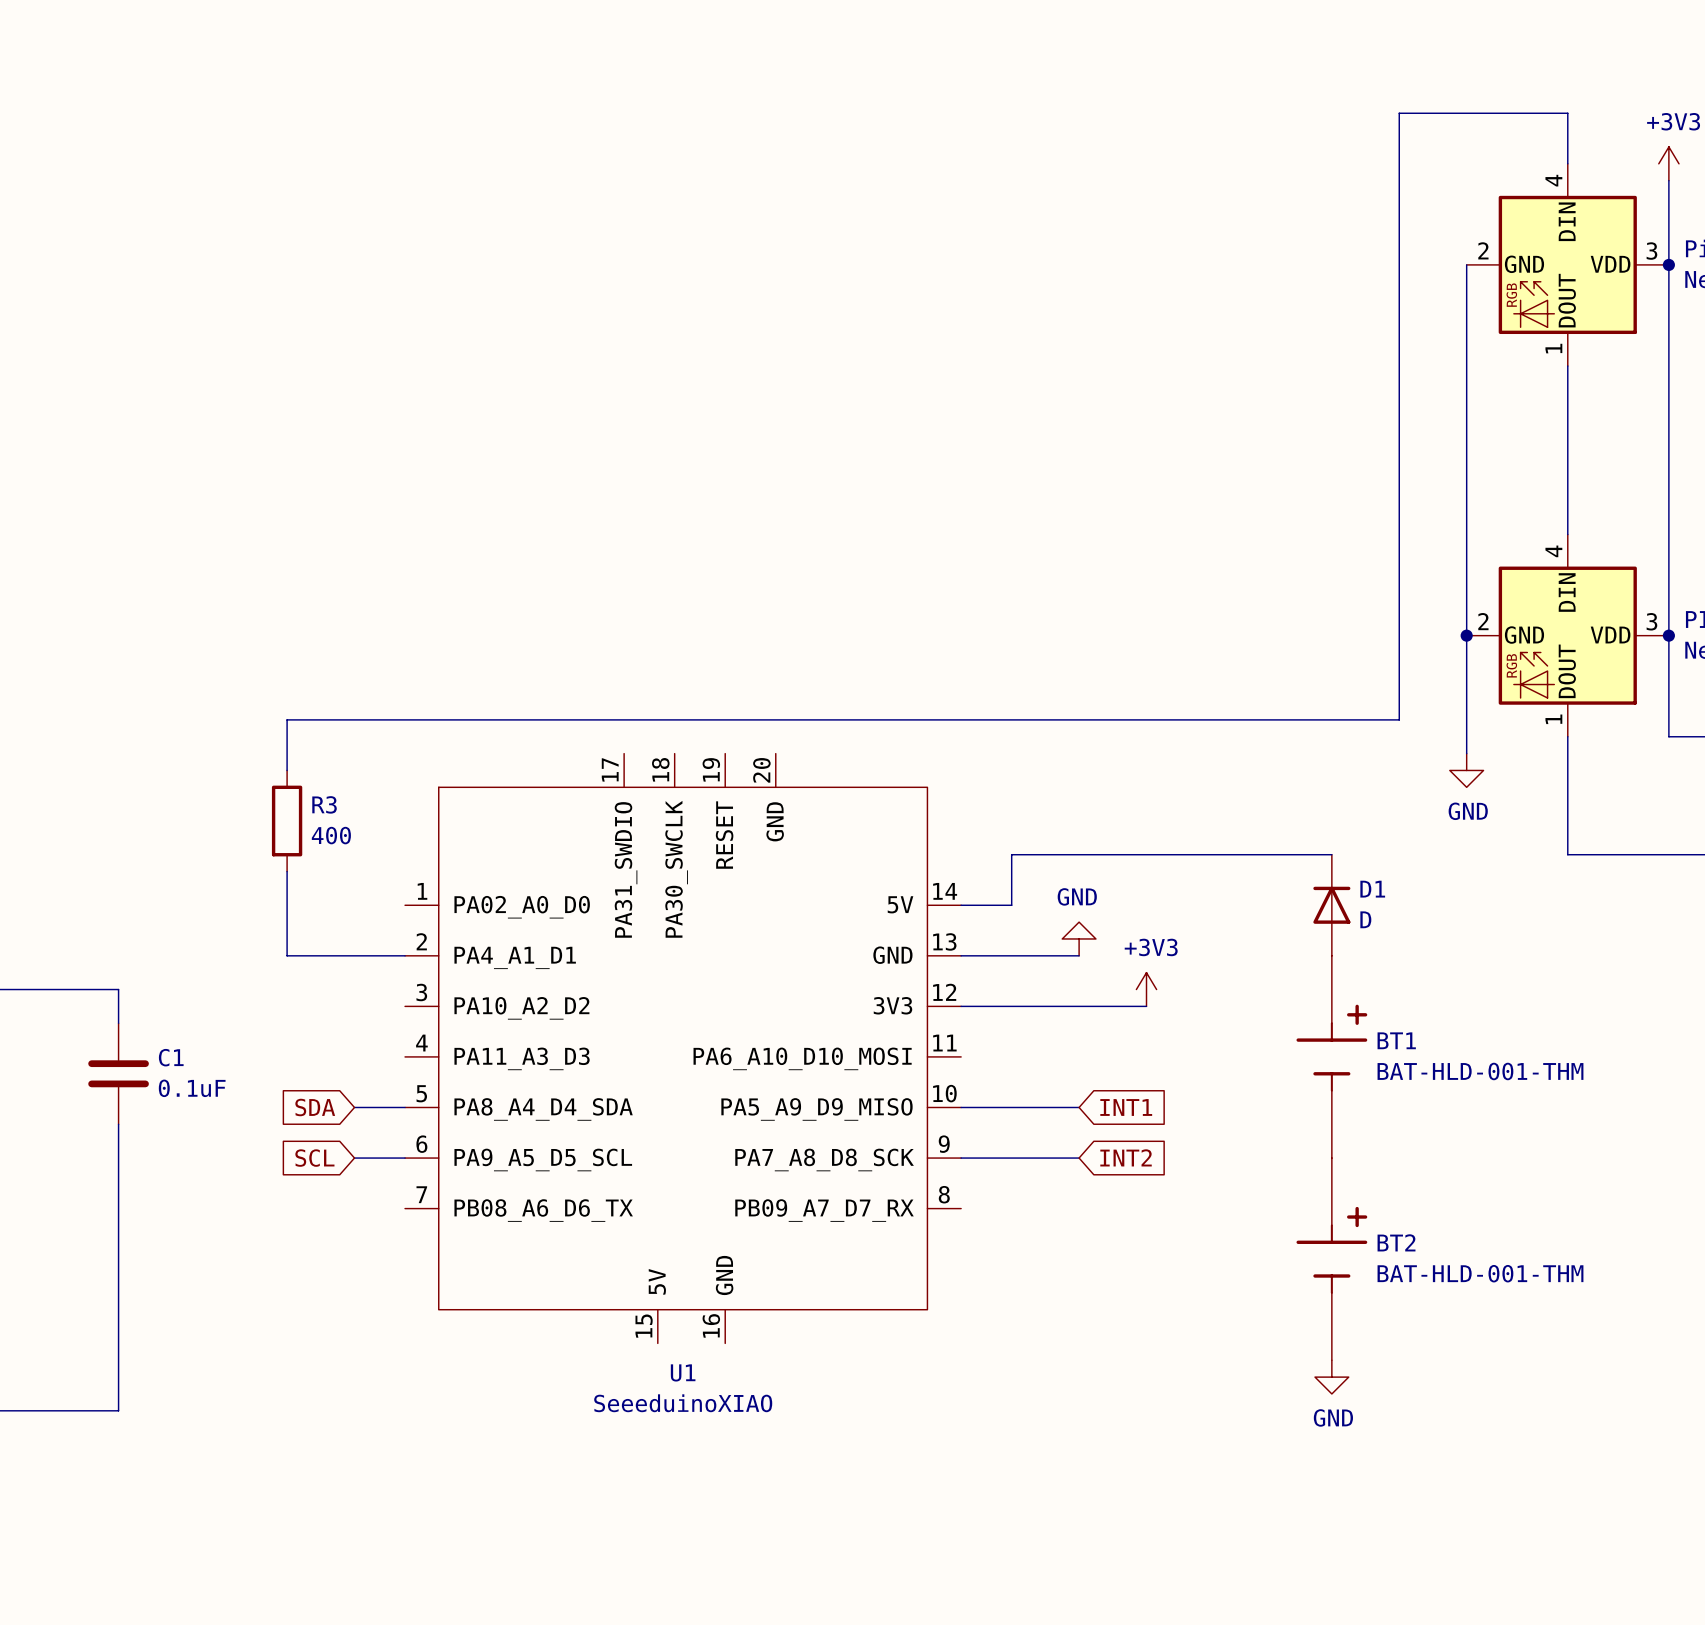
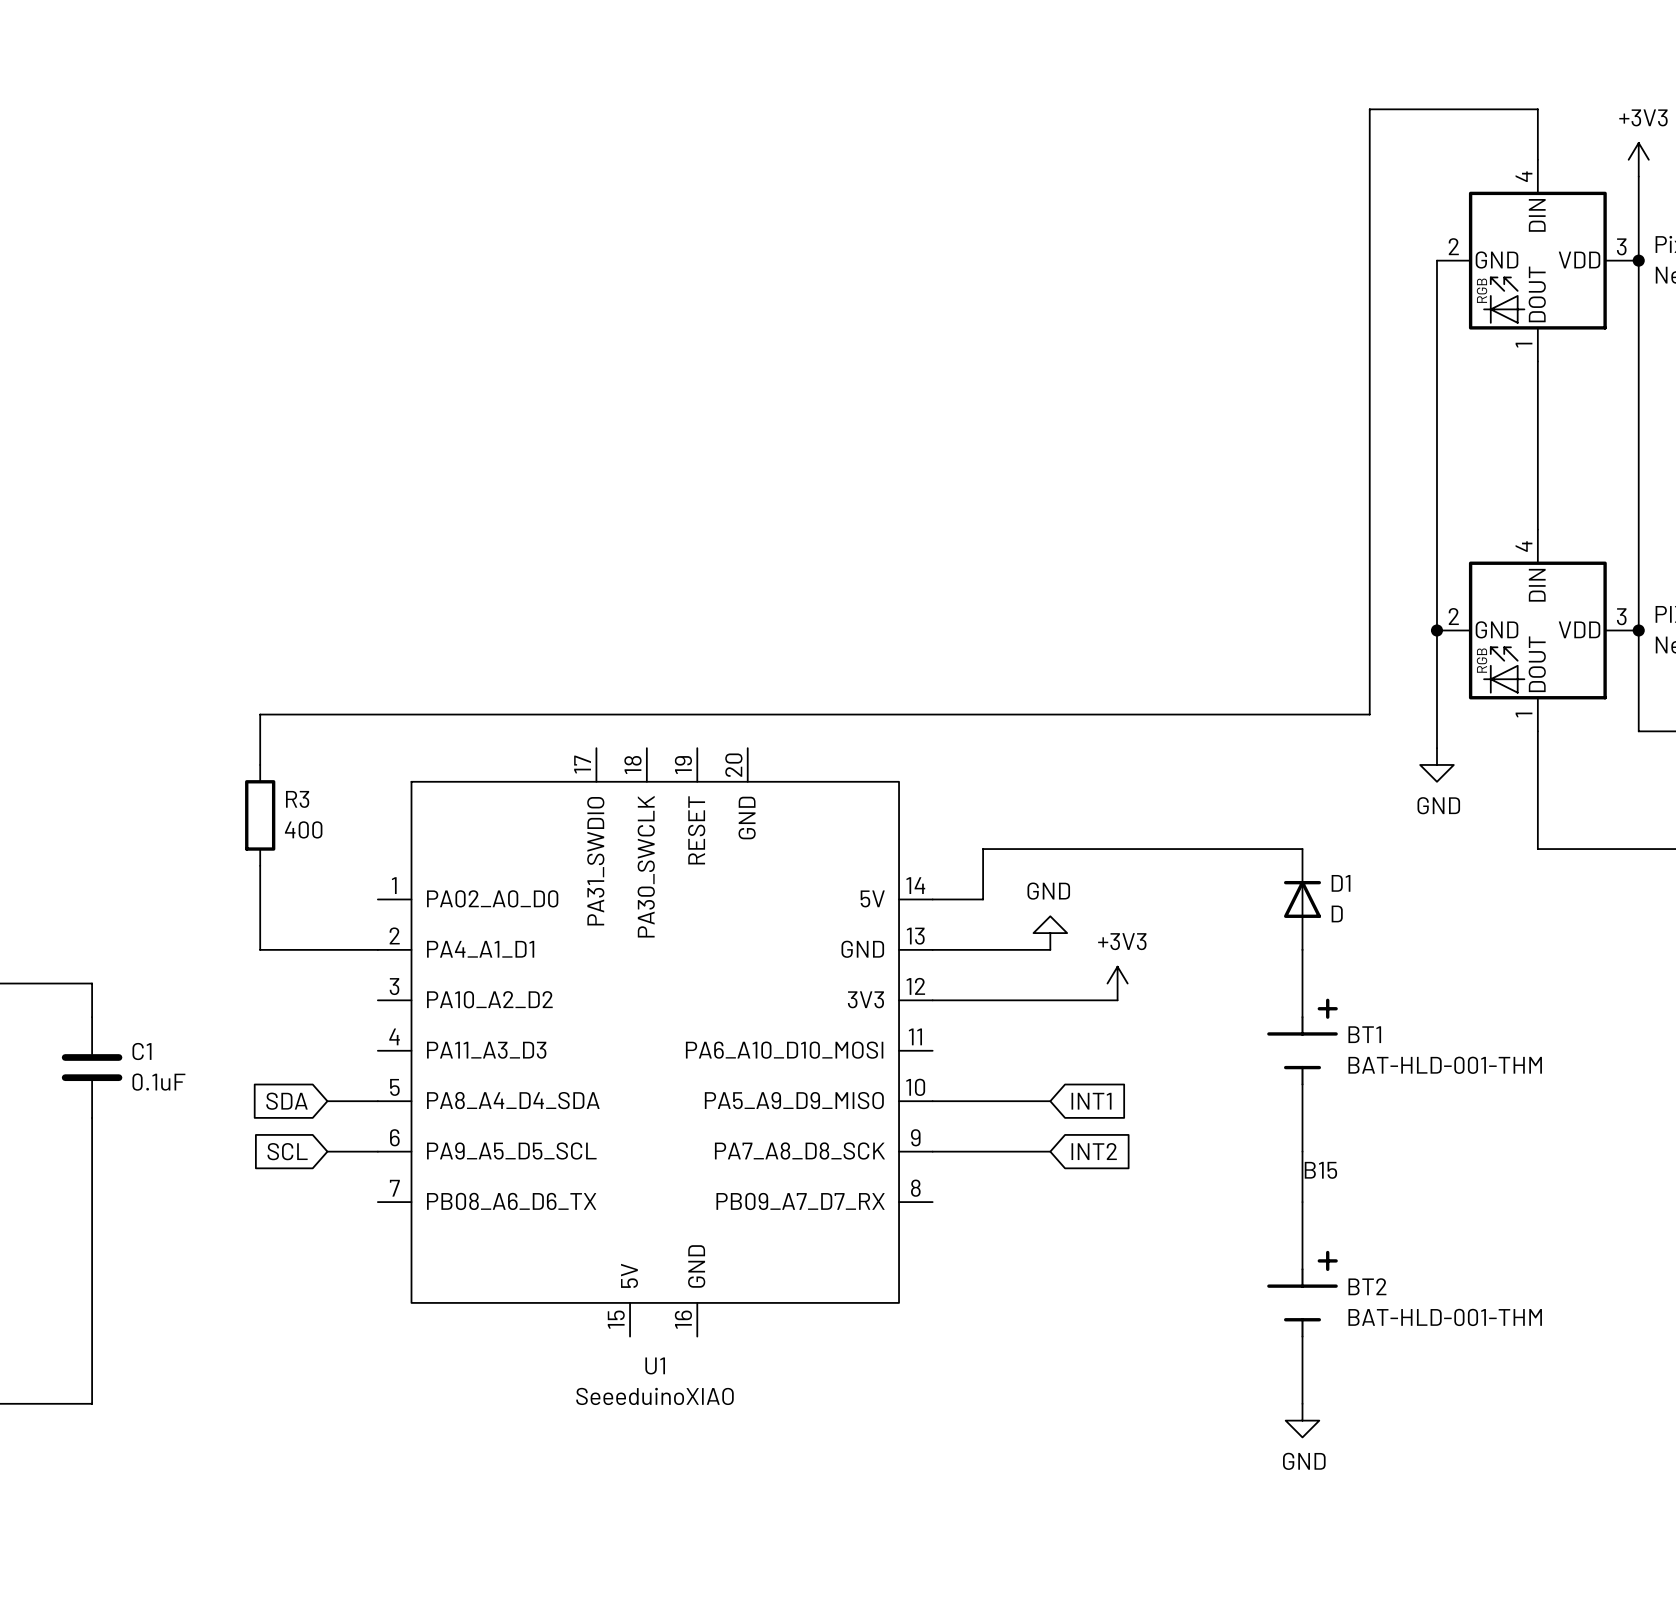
label: none -> B15 (1320, 1170)
BT2 position: (1331, 1259) -> (1302, 1302)
power symbol position: GND (1331, 1377) -> GND (1302, 1420)

